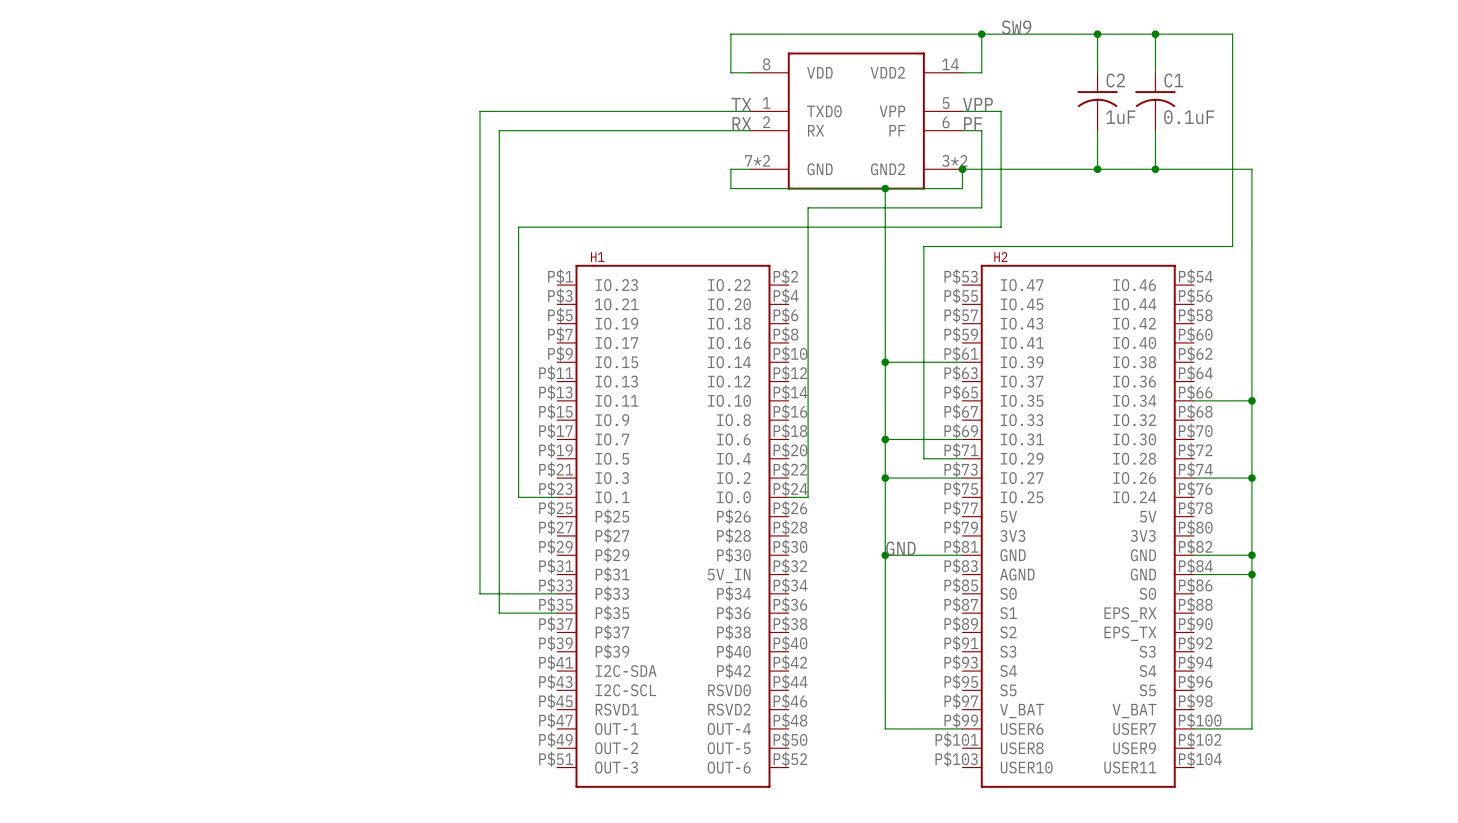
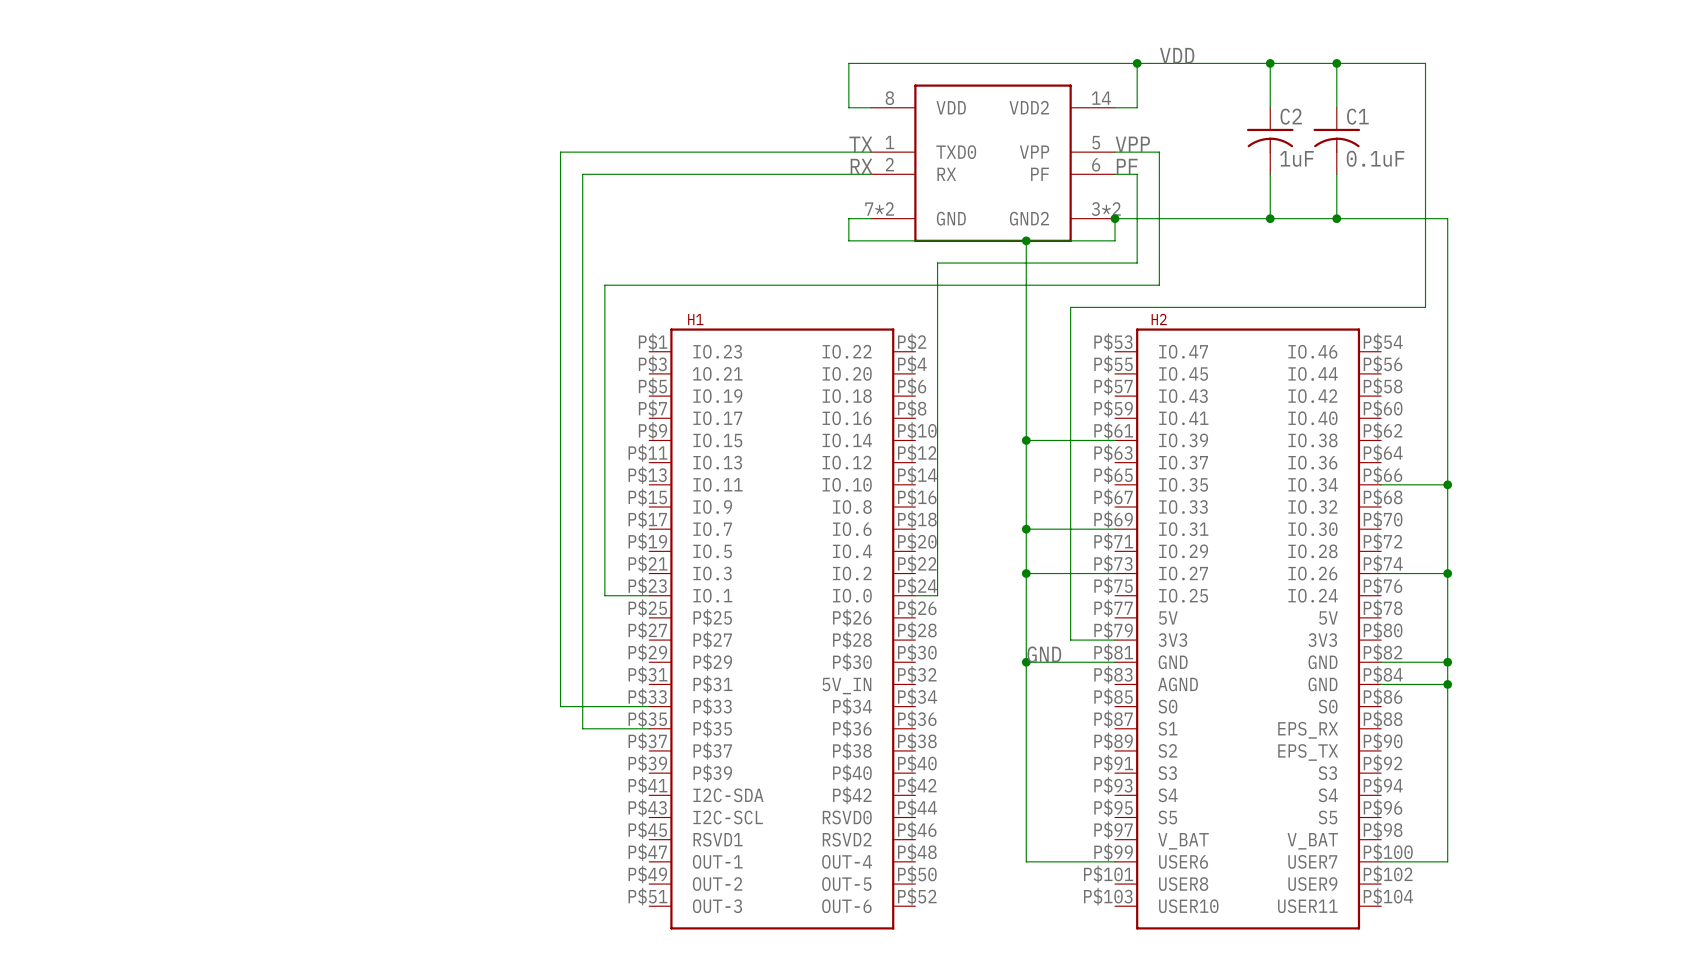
label: SW9 (1016, 27) -> VDD (1177, 55)
wire: (923, 458) (962, 458) -> (1070, 551) (1070, 640) (1115, 640)

